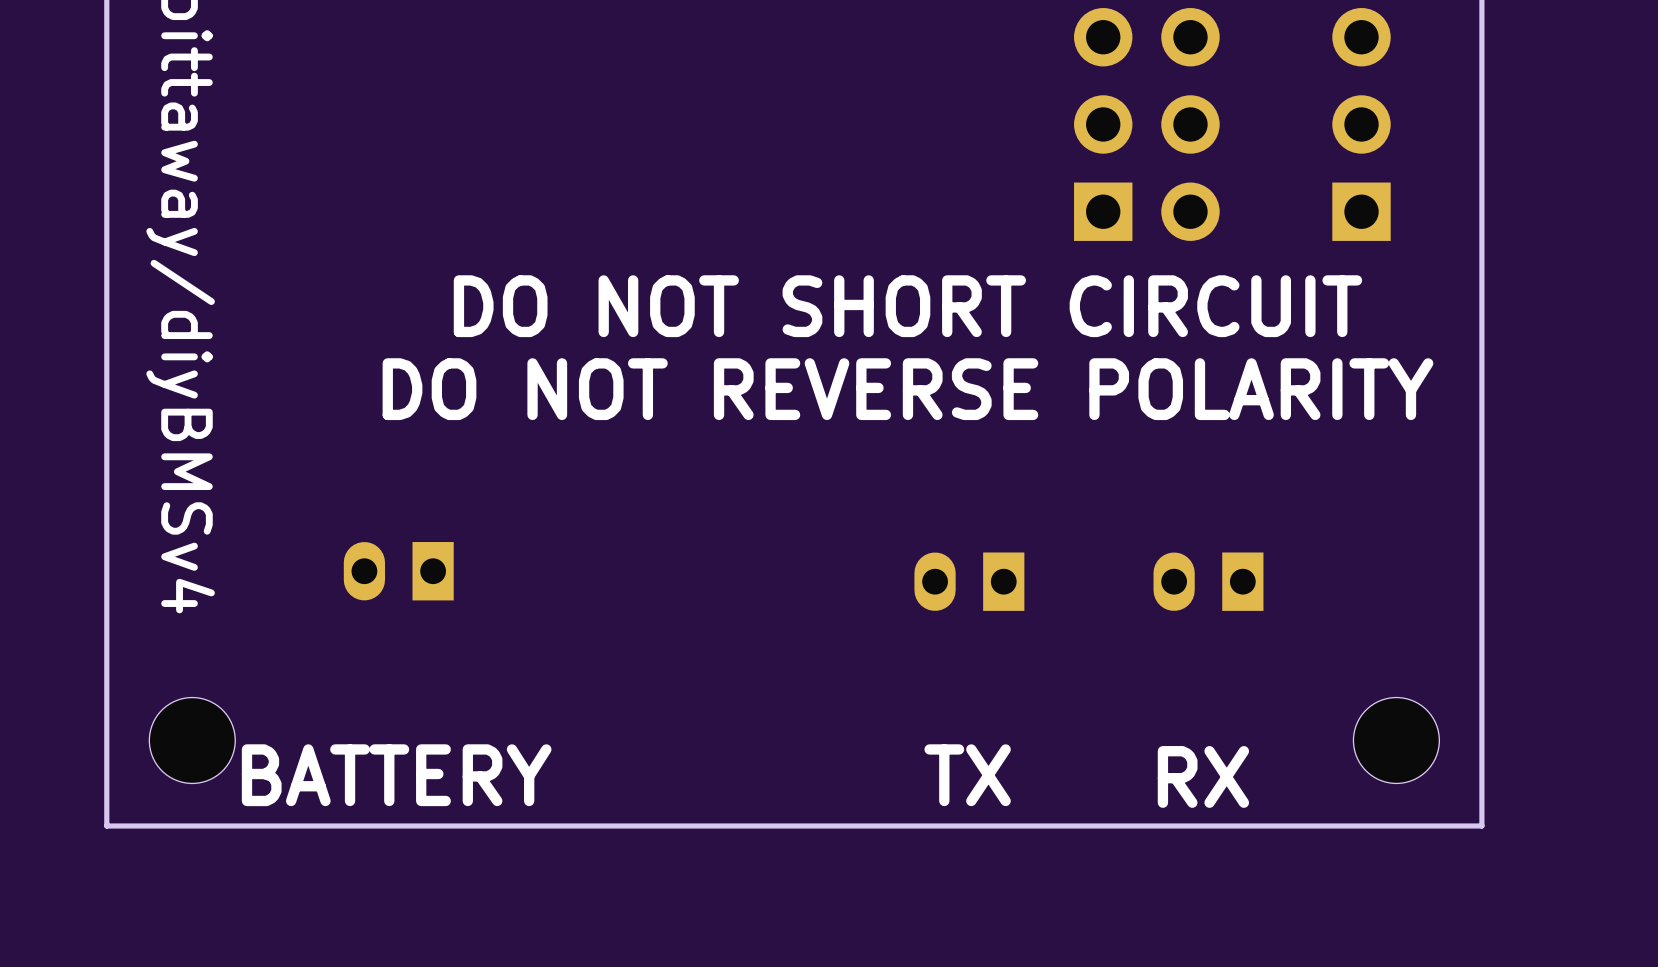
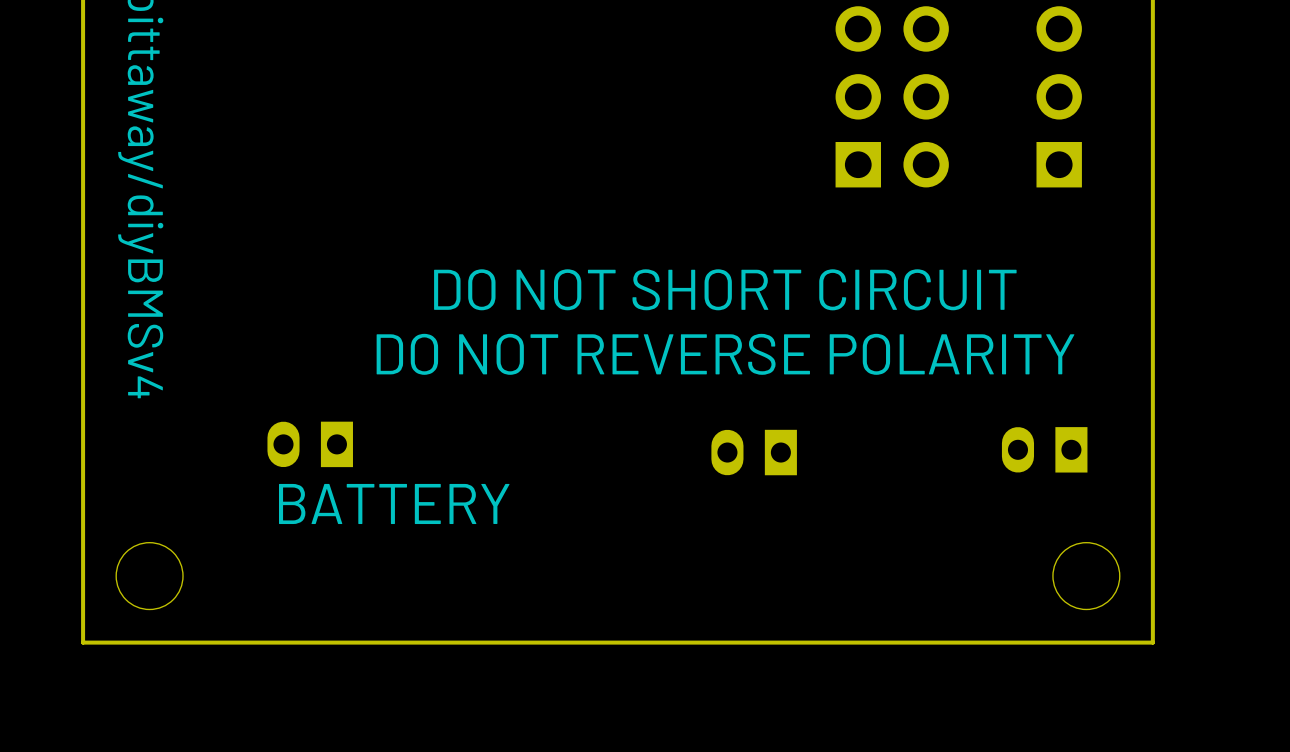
text: DO NOT SHORT CIRCUIT (907, 306) -> none
text: DO NOT REVERSE POLARITY (907, 389) -> DO NOT SHORT CIRCUIT (725, 289)
text: none -> DO NOT REVERSE POLARITY (725, 354)
part position: (1208, 581) -> (1044, 449)
text position: BATTERY (396, 775) -> BATTERY (394, 503)
text: TX (967, 775) -> none
text: RX (1203, 776) -> none

